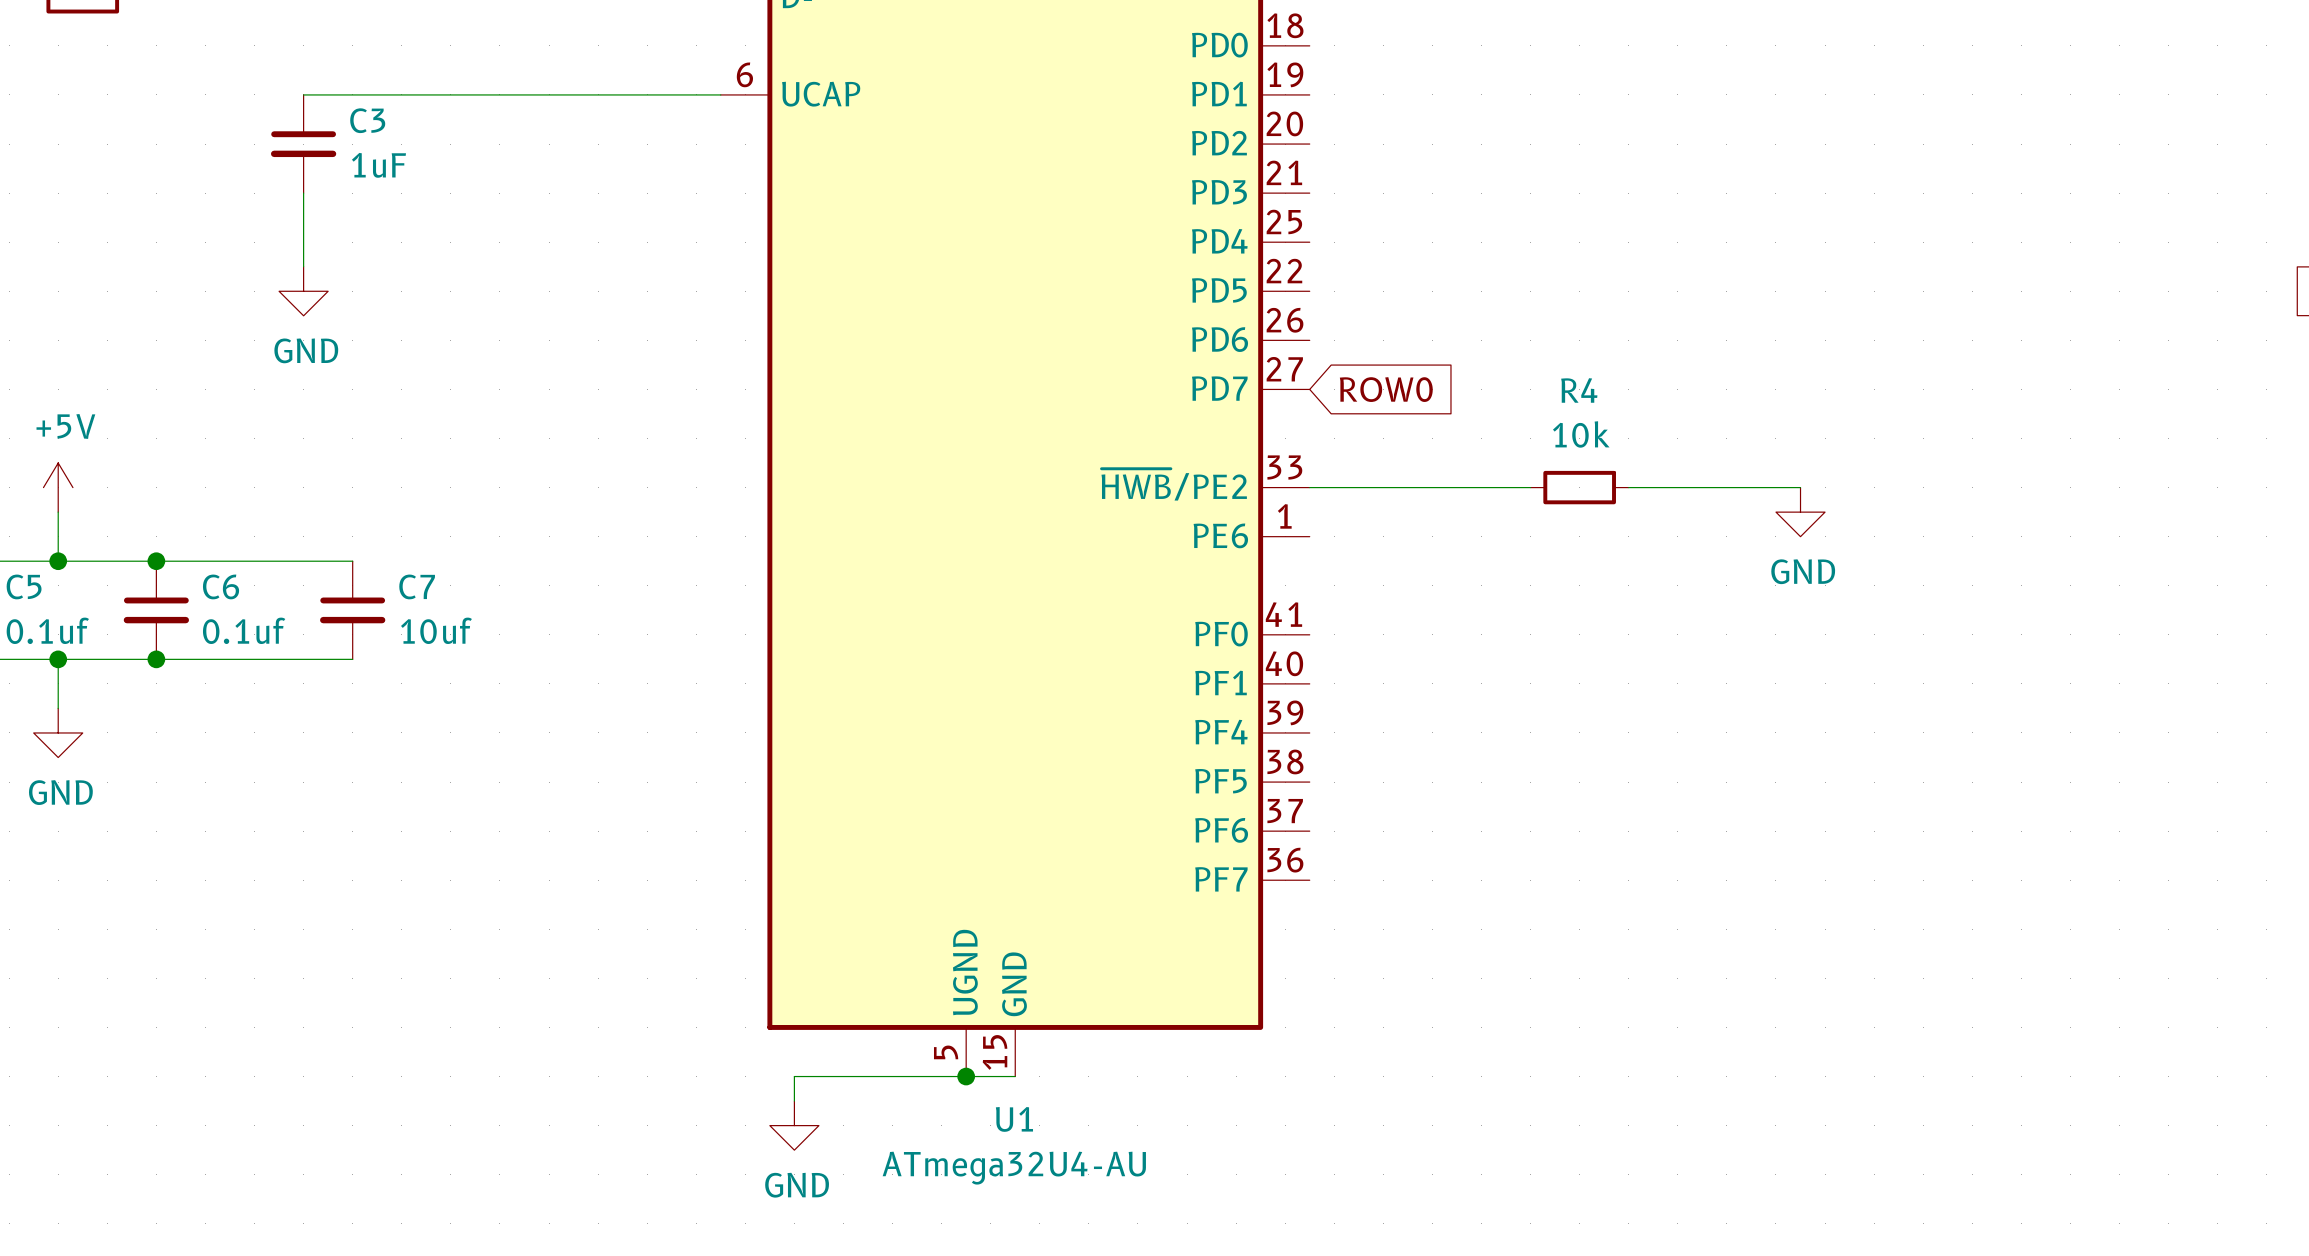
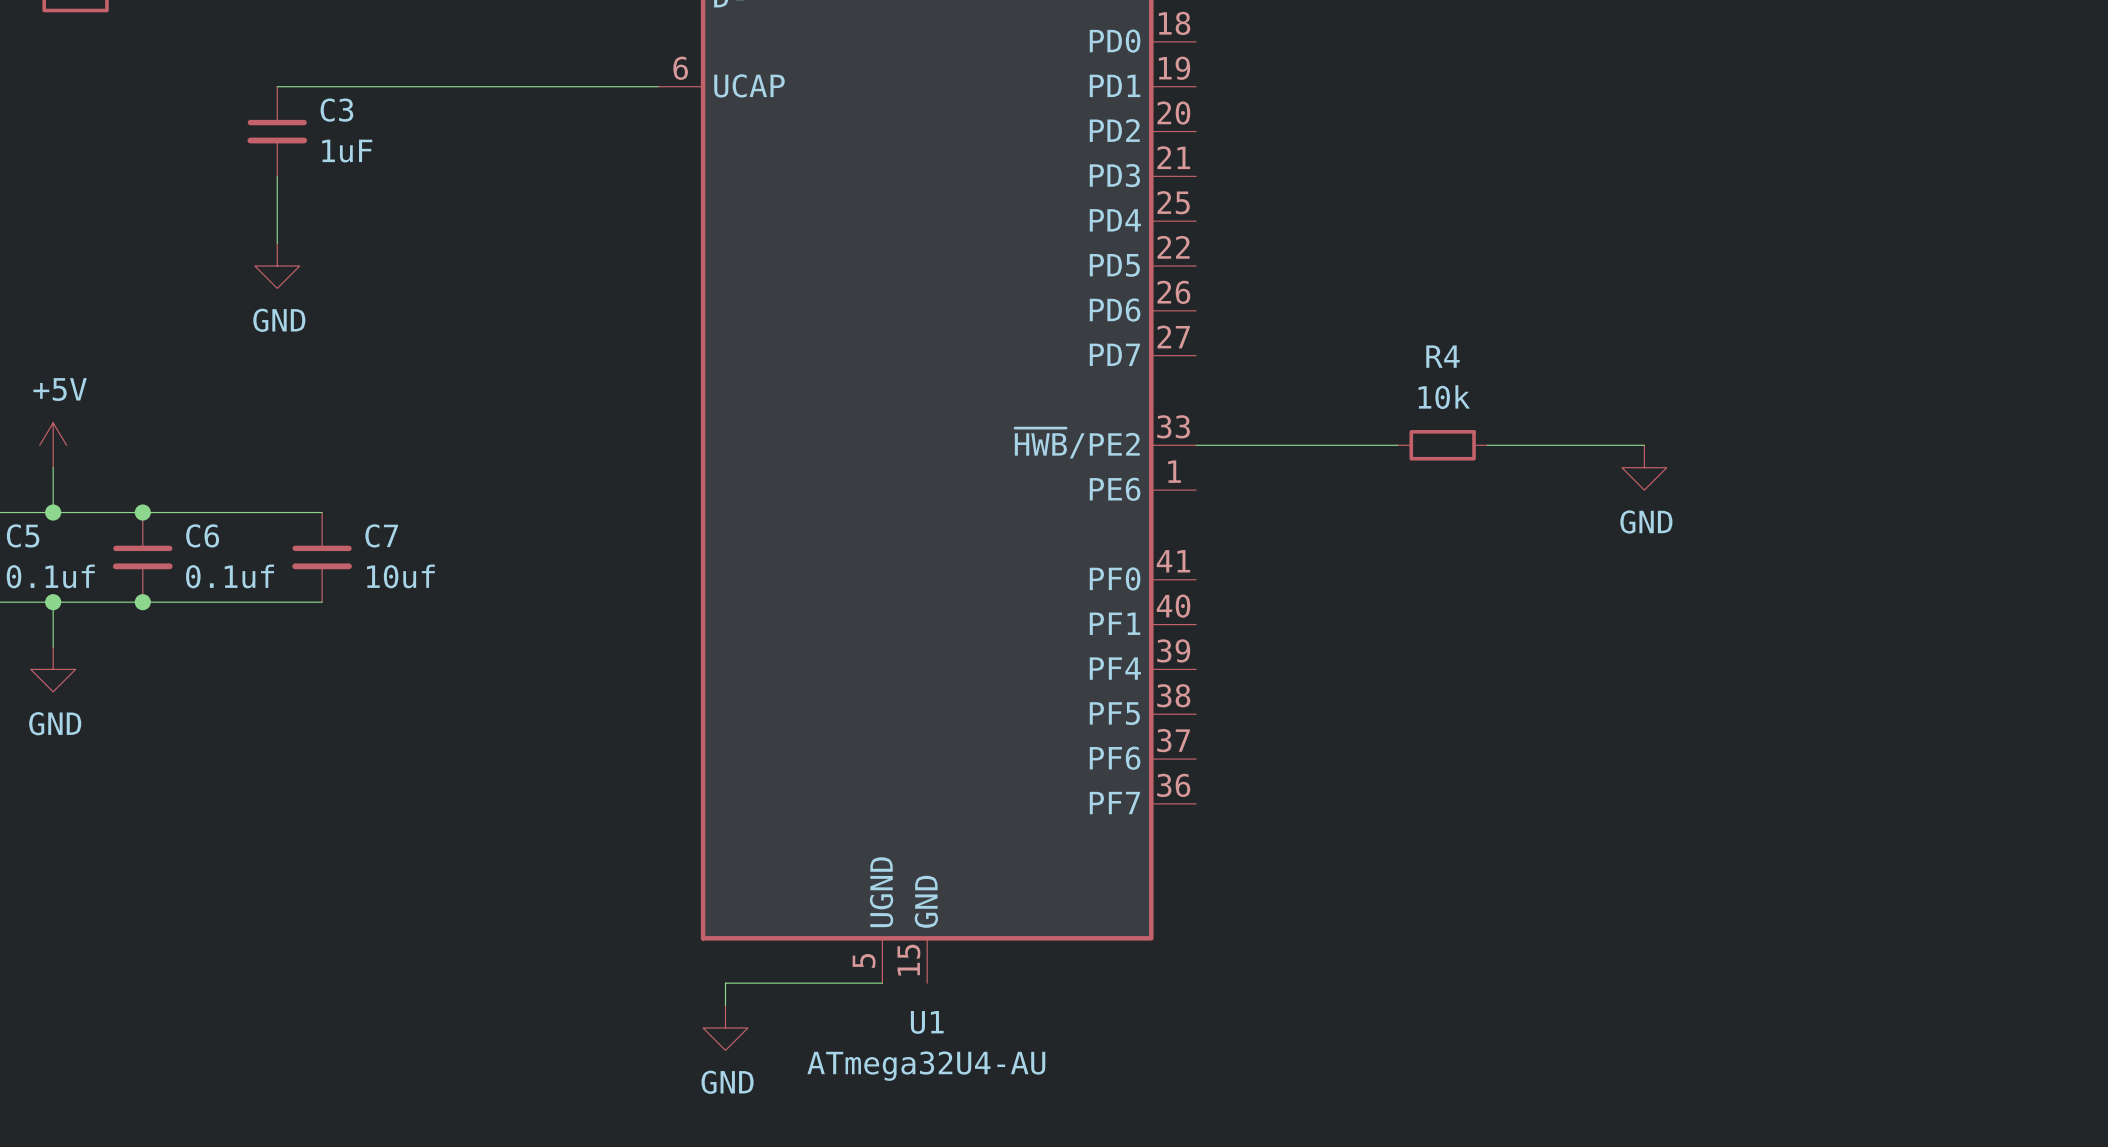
global label: ROW0 (1386, 389) -> none
wire: (966, 1076) (1015, 1076) -> none
junction: (966, 1076) -> none

